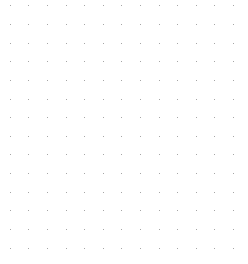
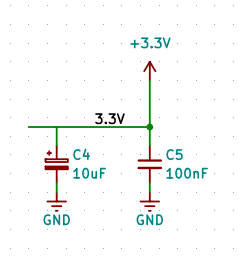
power symbol: none -> +3.3V (149, 71)
wire: none -> (149, 80) (149, 145)
label: none -> 3.3V (109, 118)
wire: none -> (28, 127) (149, 127)
wire: none -> (56, 127) (56, 145)
junction: none -> (149, 127)
C4: none -> 10uF (56, 164)
C5: none -> 100nF (149, 164)
wire: none -> (56, 182) (56, 192)
wire: none -> (149, 182) (149, 192)
power symbol: none -> GND (56, 201)
power symbol: none -> GND (149, 201)

